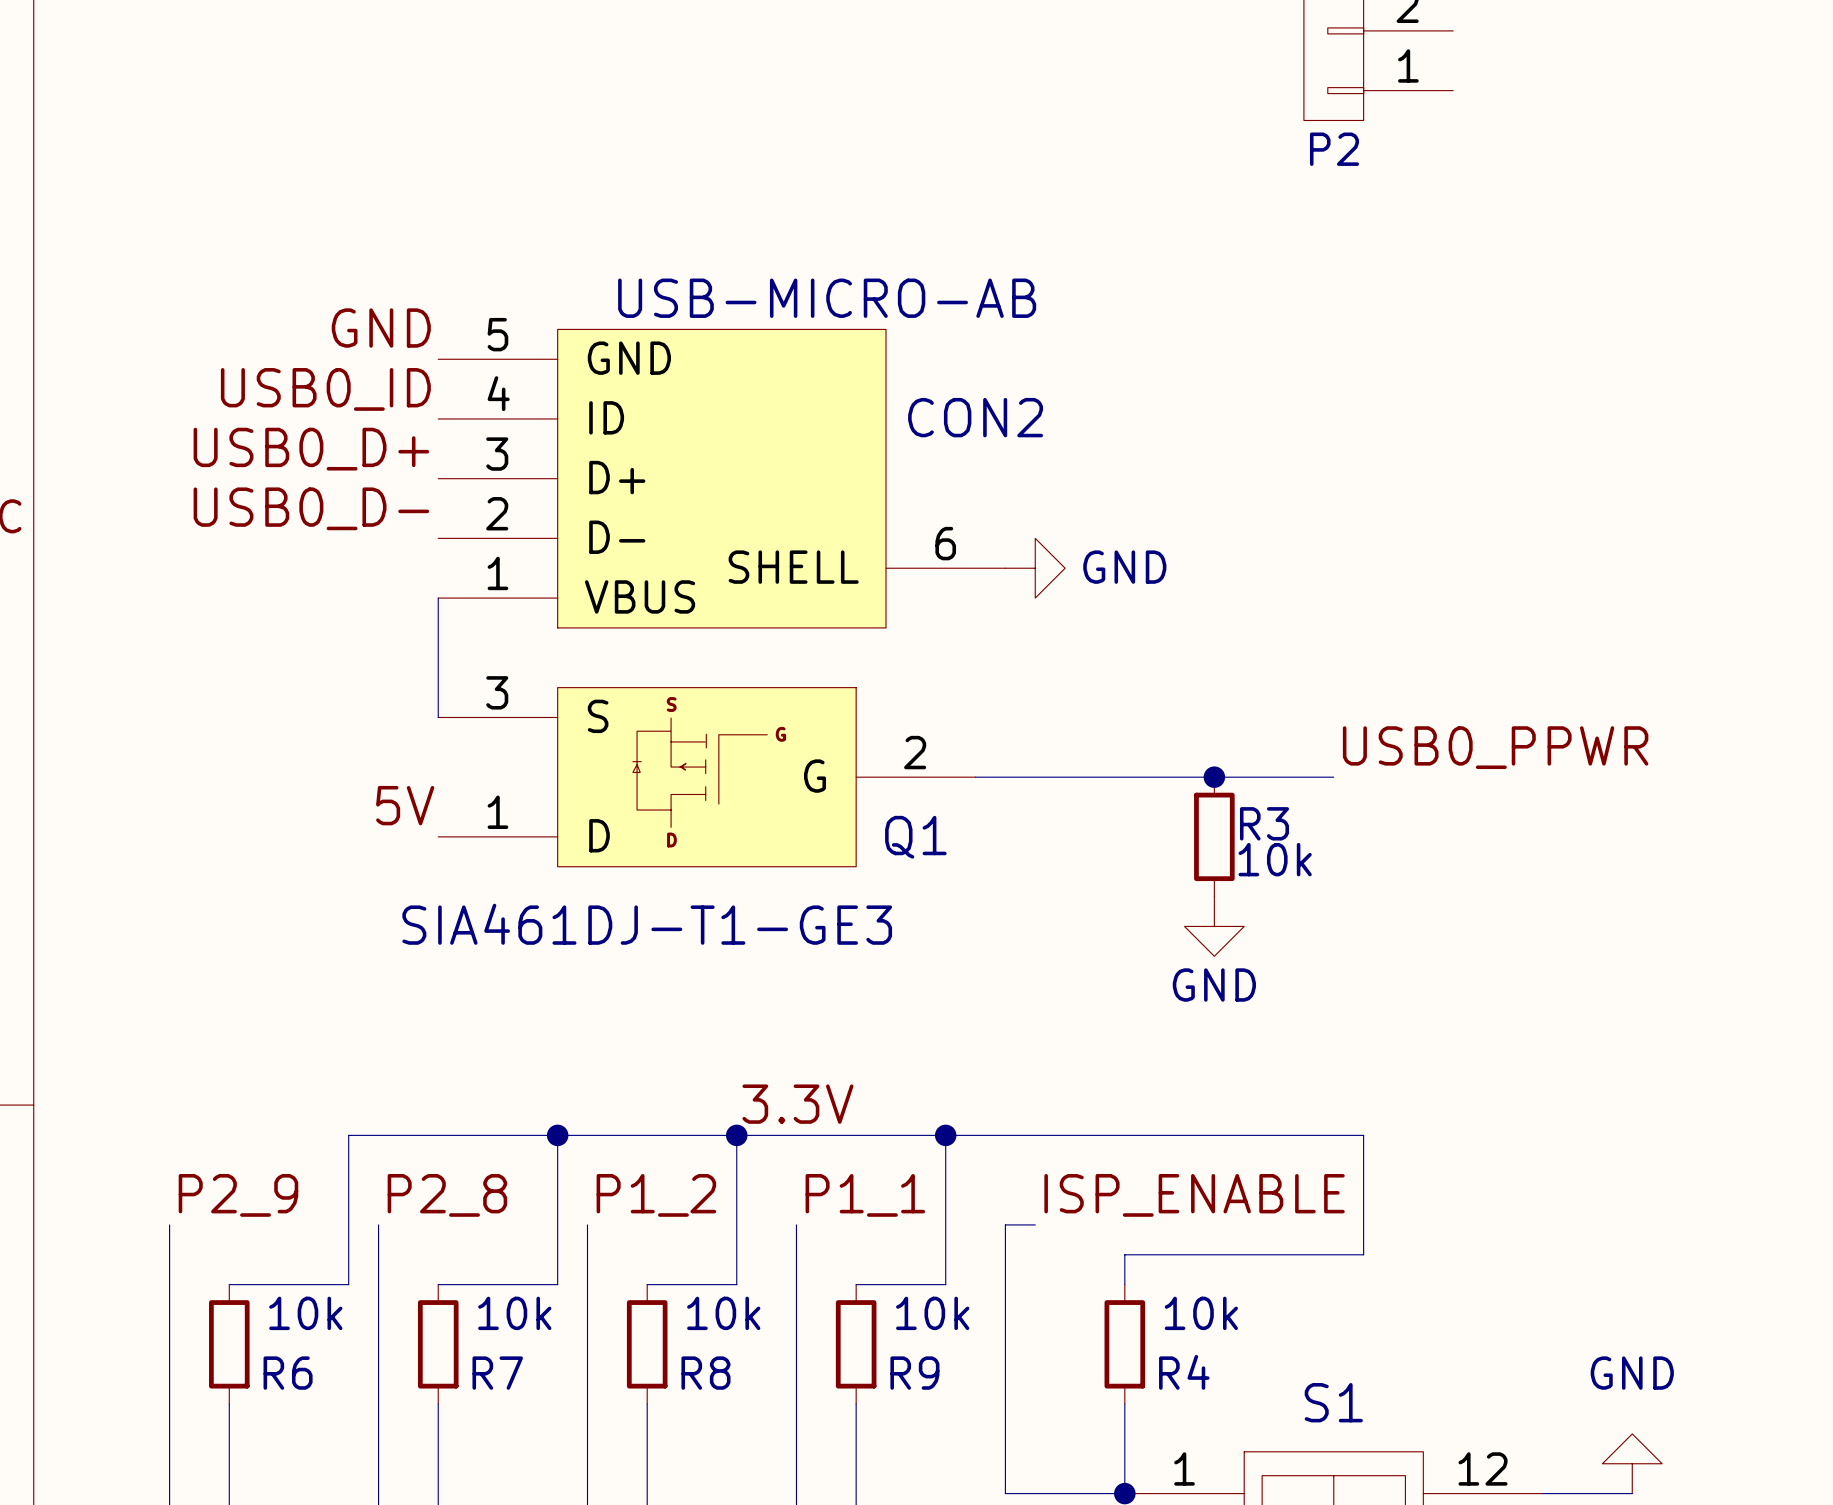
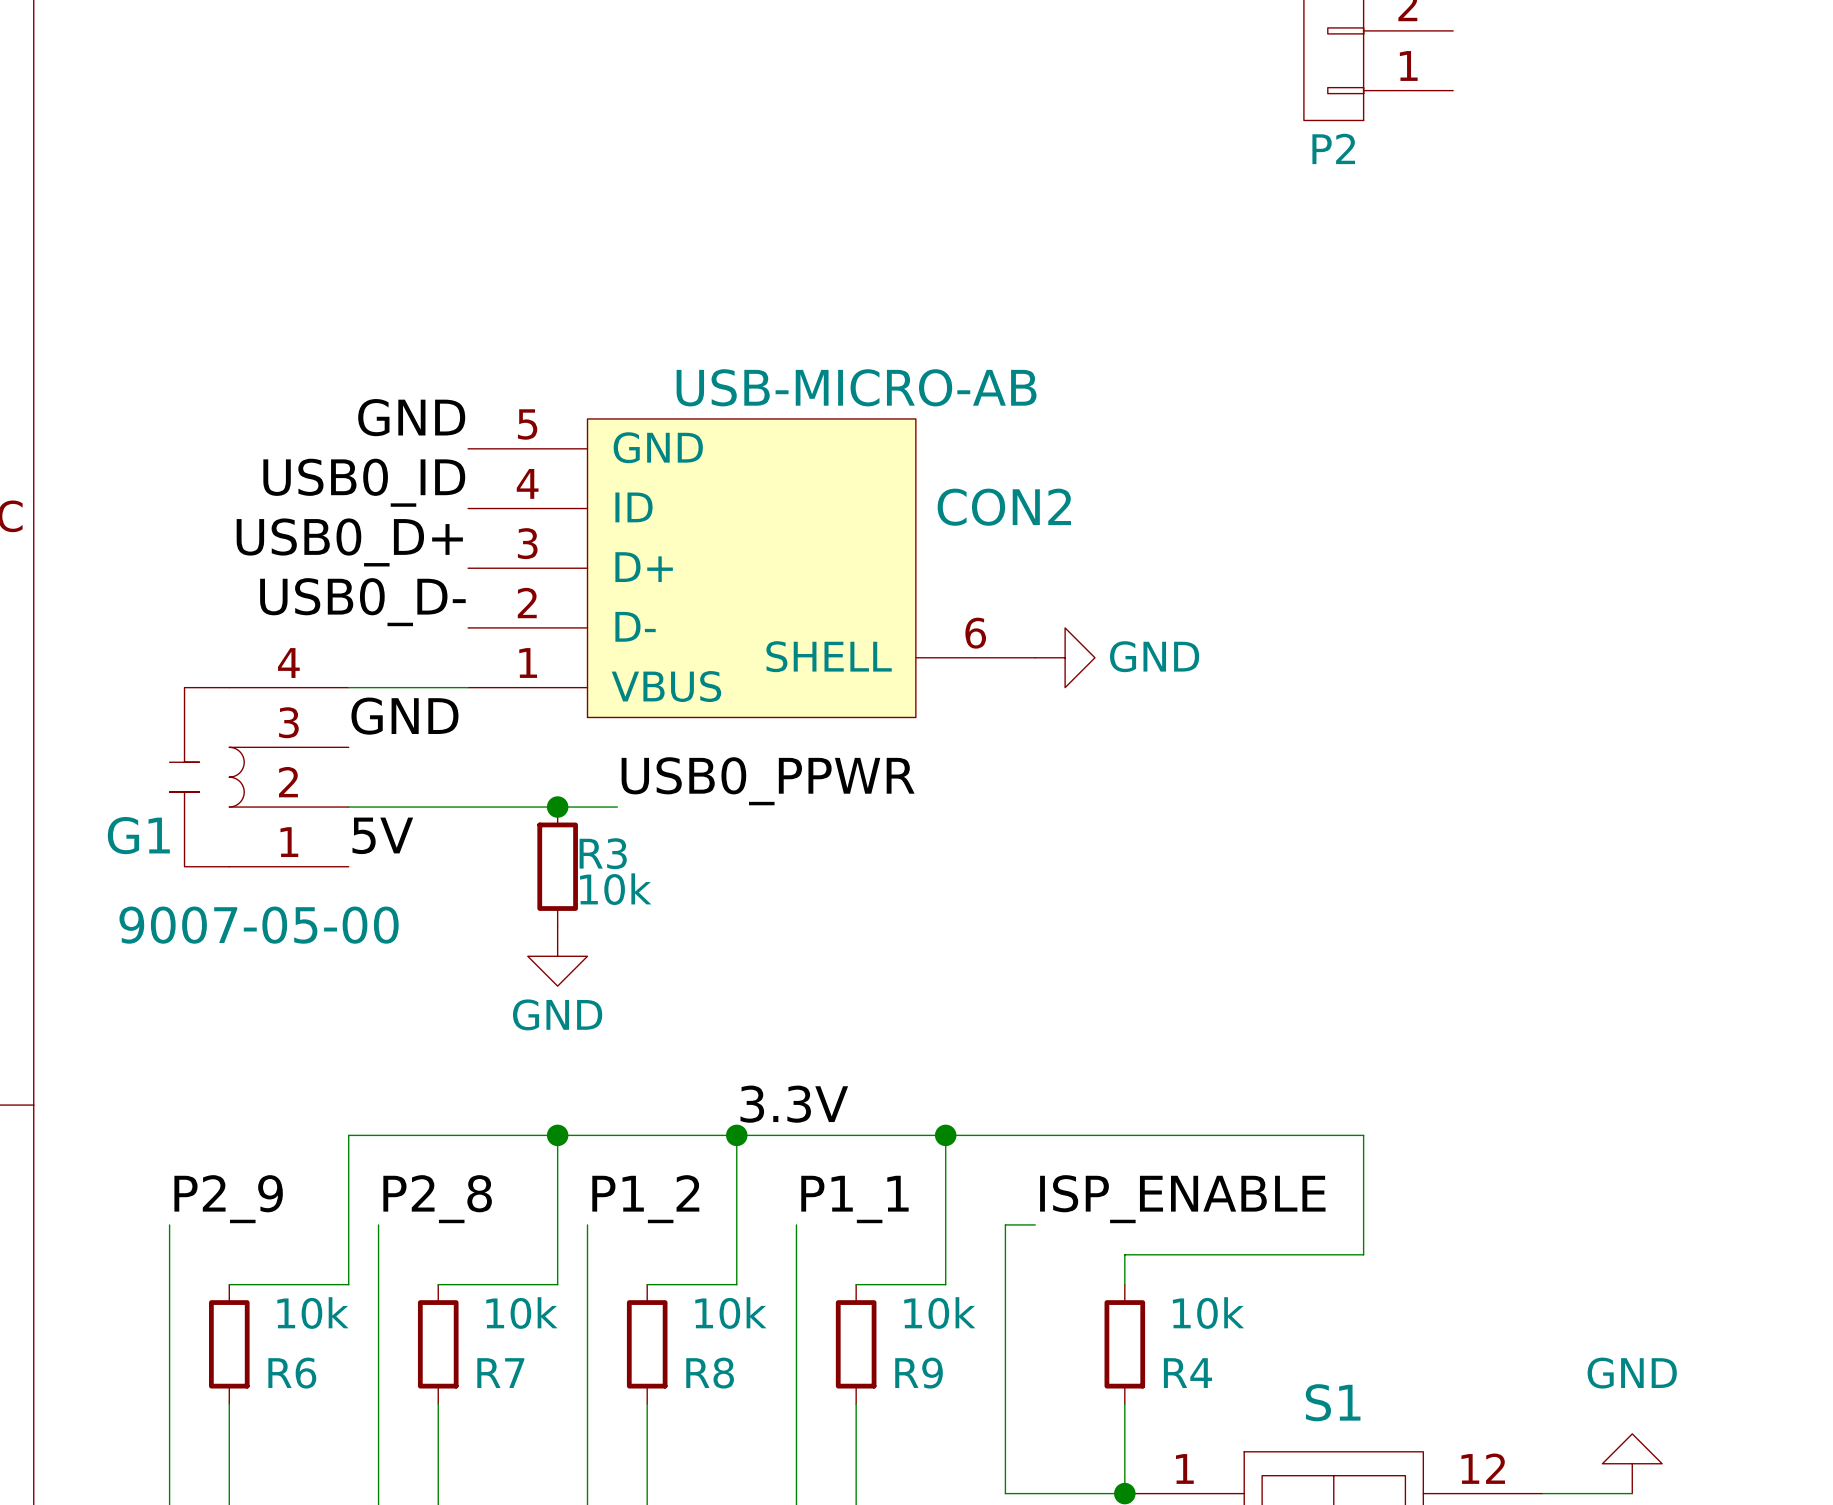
label position: GND (381, 328) -> GND (411, 417)
label position: USB0_ID (325, 389) -> USB0_ID (364, 482)
label position: USB0_D+ (311, 449) -> USB0_D+ (349, 542)
CON2 position: (721, 478) -> (751, 568)
label position: USB0_D- (311, 508) -> USB0_D- (362, 602)
power symbol position: GND (1035, 568) -> GND (1065, 657)
wire: (438, 598) (438, 717) -> none
wire: none -> (348, 687) (468, 687)
label: none -> GND (404, 716)
label: USB0_PPWR (1495, 747) -> none
G1: none -> 9007-05-00 (259, 777)
Q1: SIA461DJ-T1-GE3 (706, 777) -> none
label: none -> USB0_PPWR (768, 781)
wire: (975, 777) (1333, 777) -> none
junction: (1214, 777) -> none
label position: 5V (405, 805) -> 5V (382, 835)
wire: none -> (348, 807) (617, 807)
junction: none -> (557, 807)
R3 position: (1214, 836) -> (557, 866)
power symbol: GND (1214, 926) -> none
power symbol: none -> GND (557, 956)

